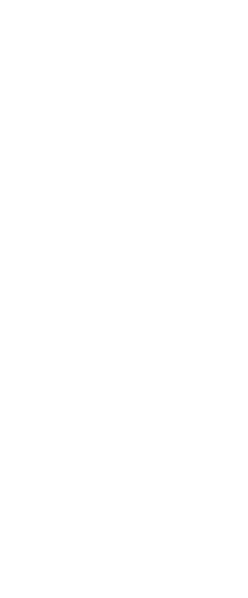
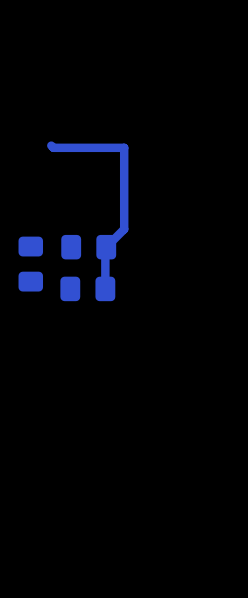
bottom track: none -> (51, 145) (53, 147) (124, 147) (124, 229) (105, 248) (105, 288)
part: none -> (88, 247)
part: none -> (30, 264)
part: none -> (87, 288)

